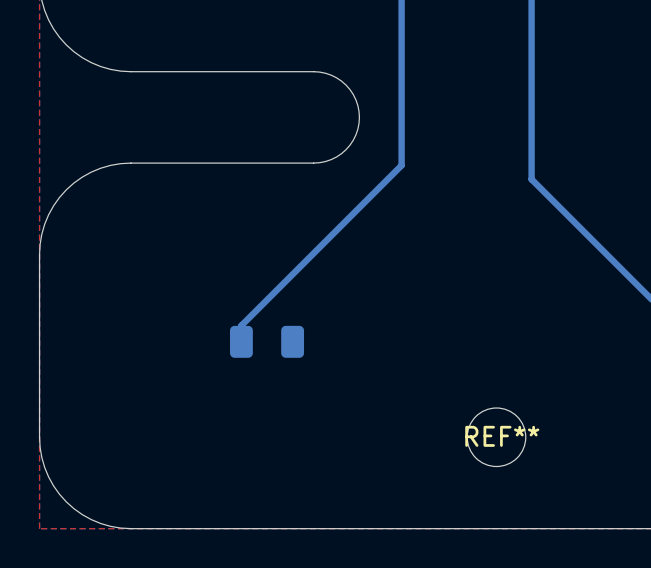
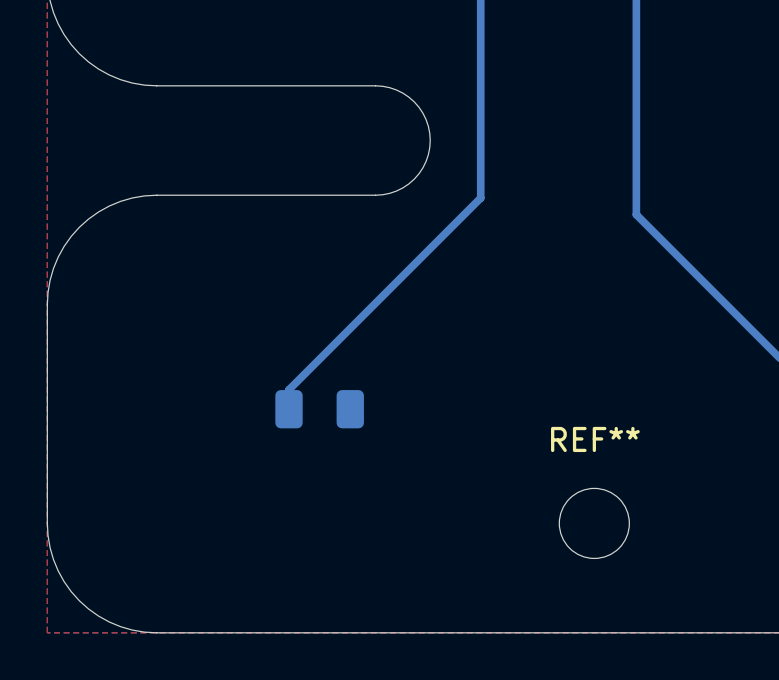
REF** name position: REF** (502, 436) -> REF** (595, 439)

